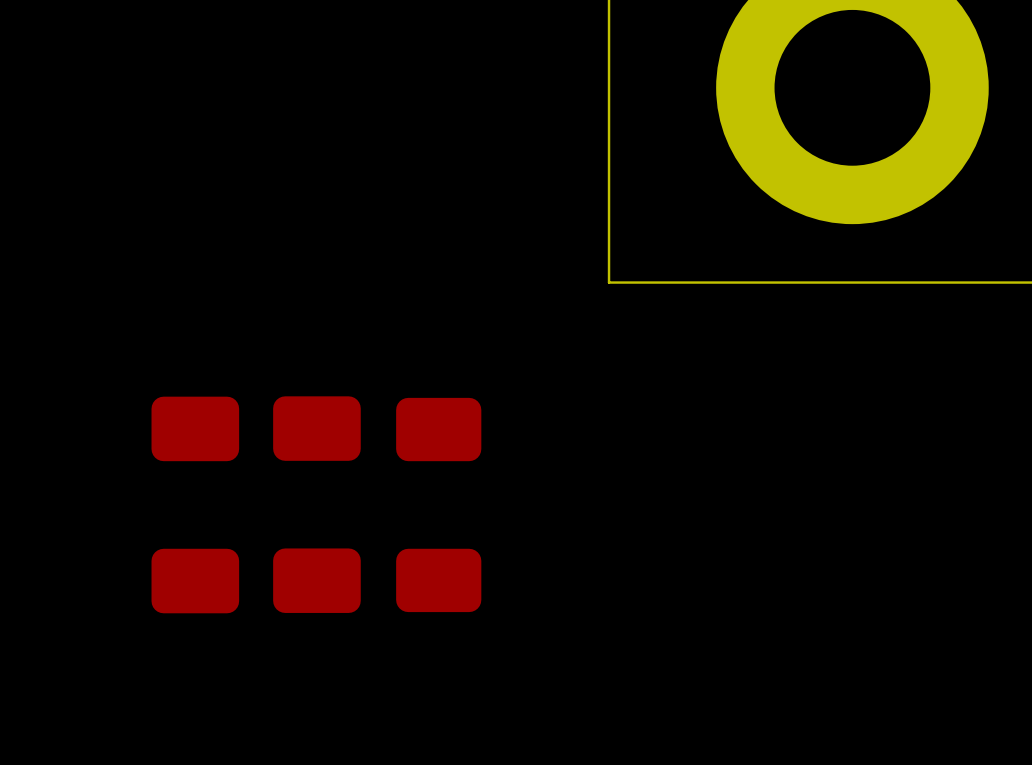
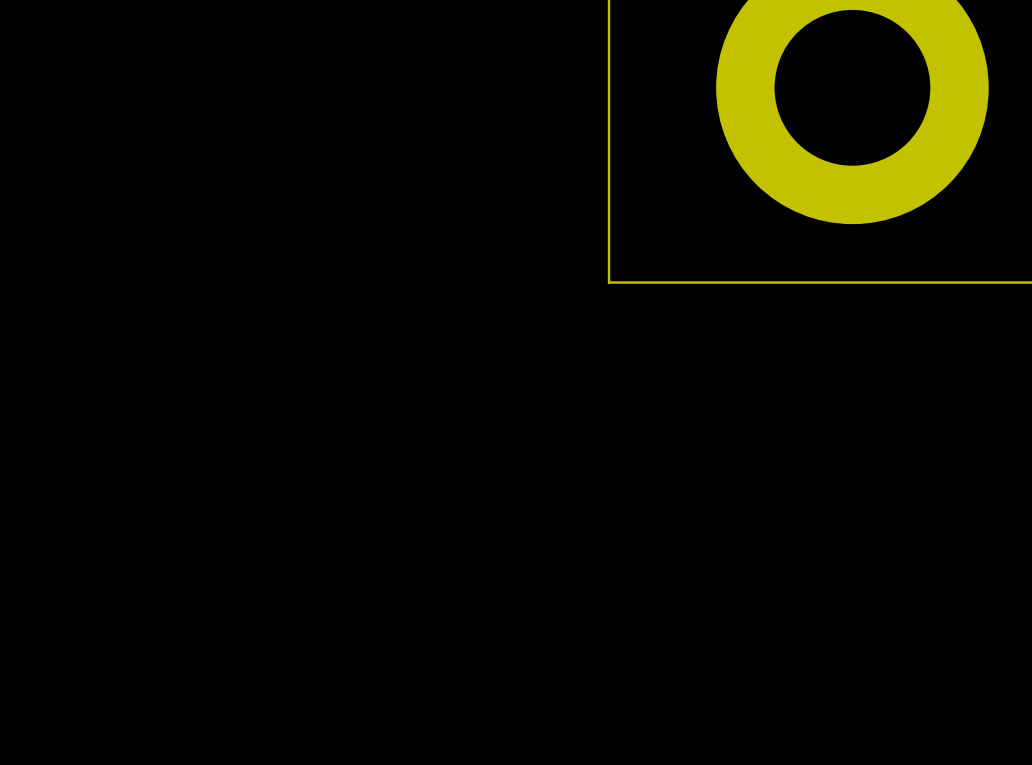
part: (195, 504) -> none
part: (316, 504) -> none
part: (438, 504) -> none

